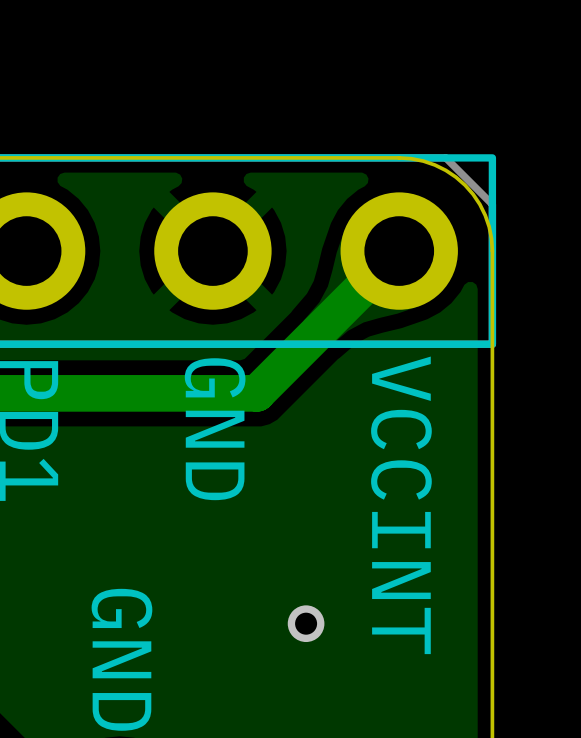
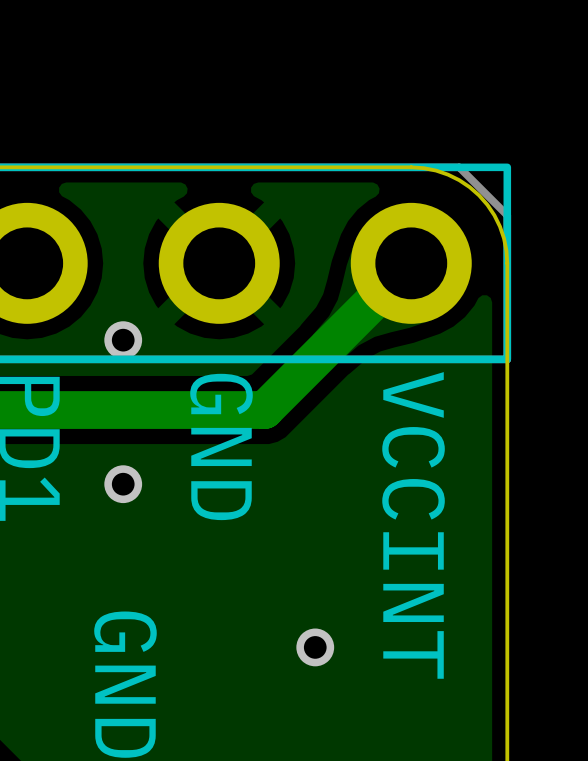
via: none -> (123, 340)
via: none -> (123, 484)

